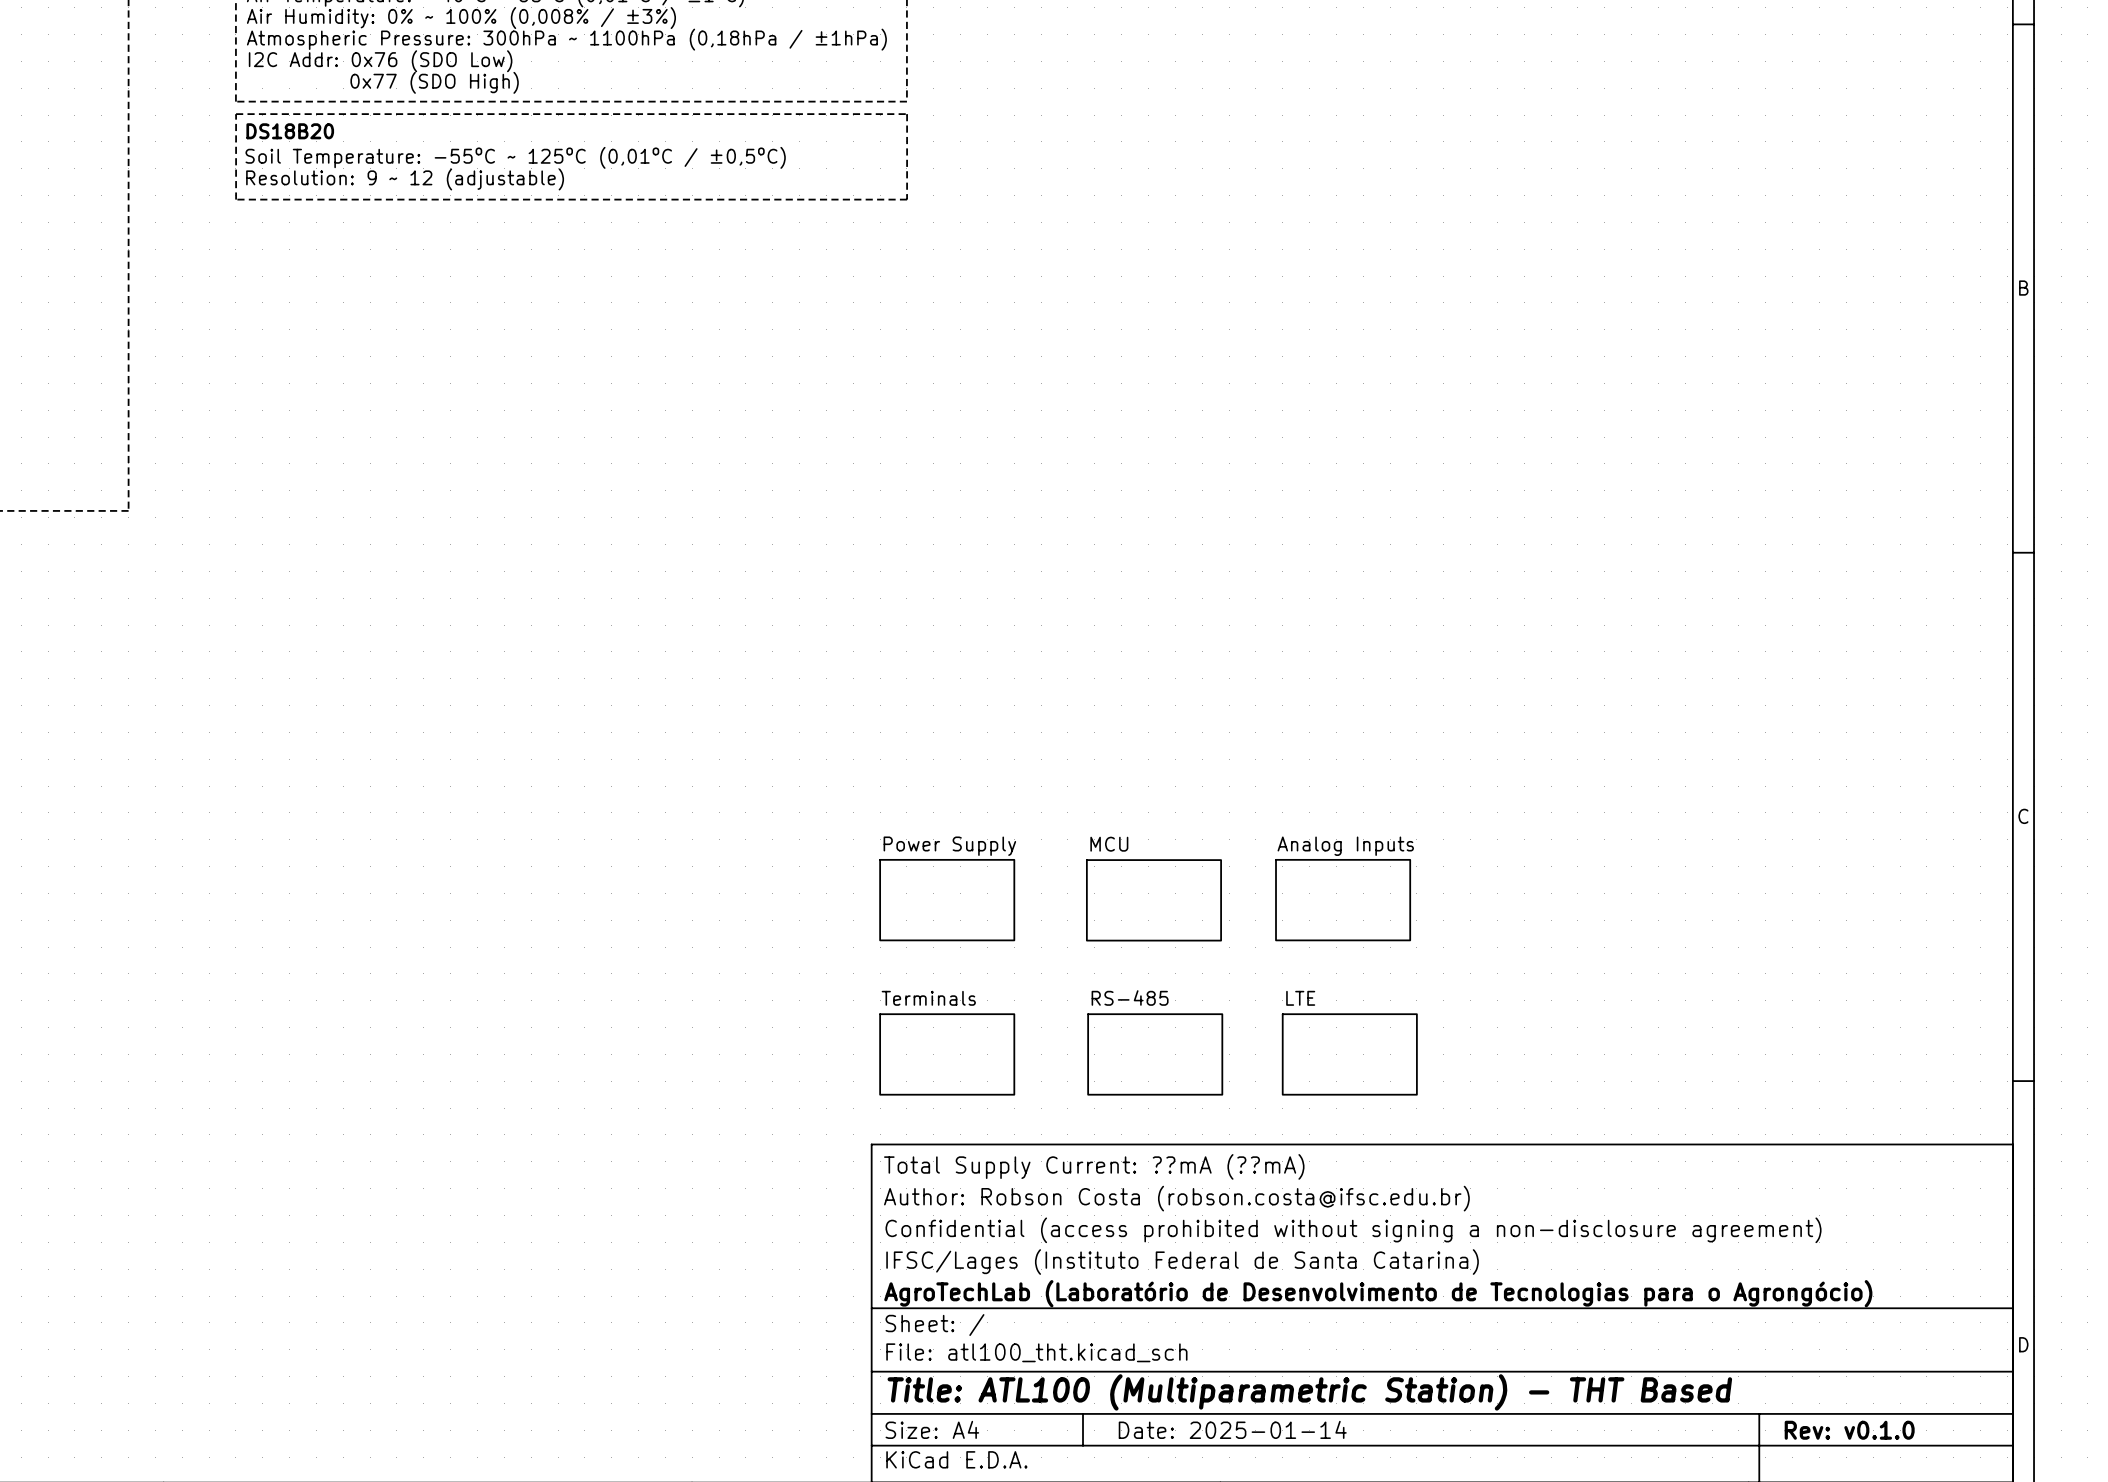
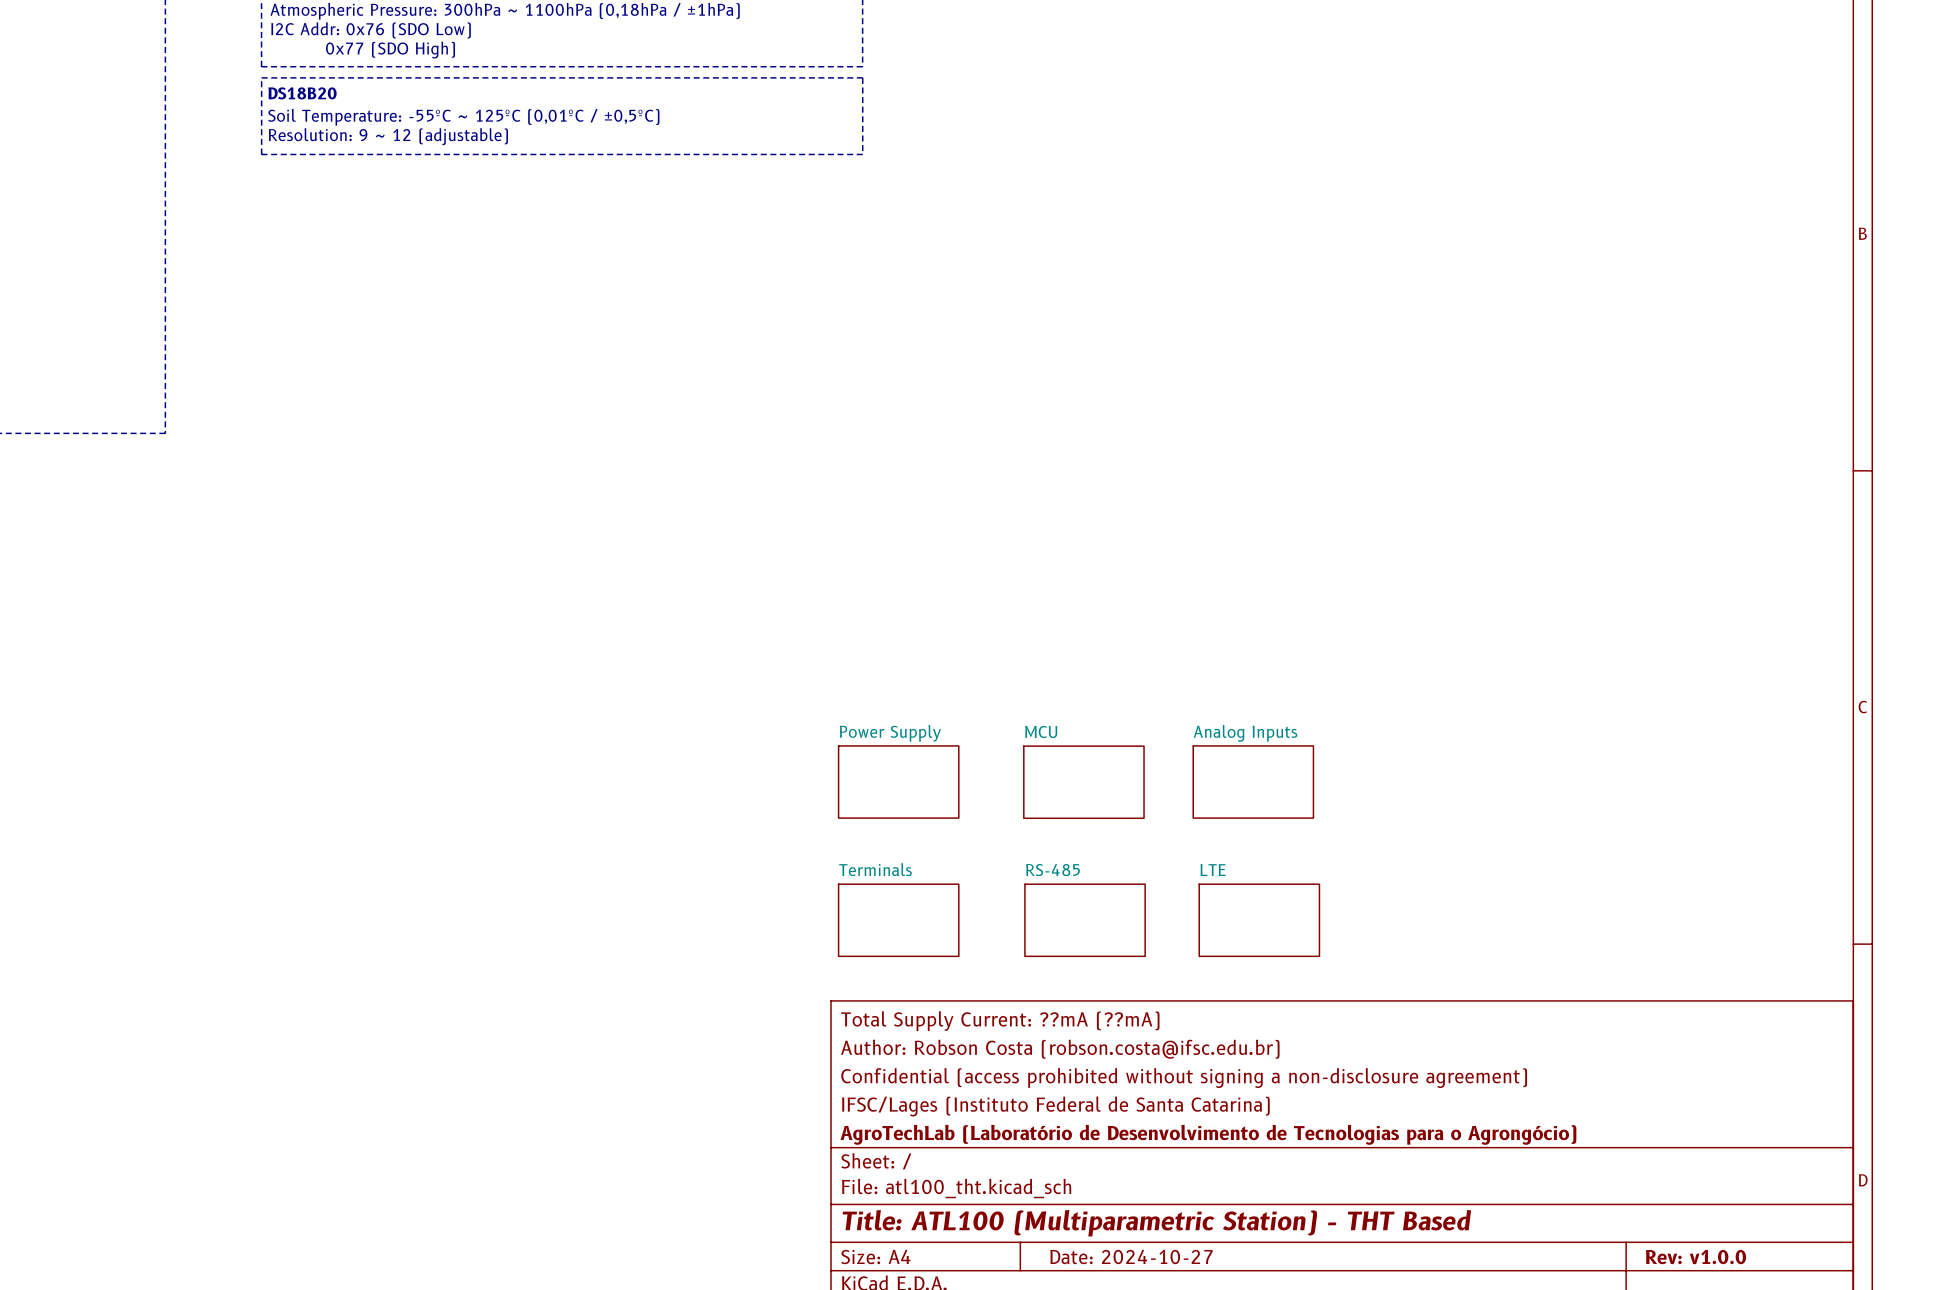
title block: Date: 2025-01-14 (1232, 1429) -> Date: 2024-10-27 (1131, 1257)
title block: Rev: v0.1.0 (1849, 1430) -> Rev: v1.0.0 (1695, 1257)

